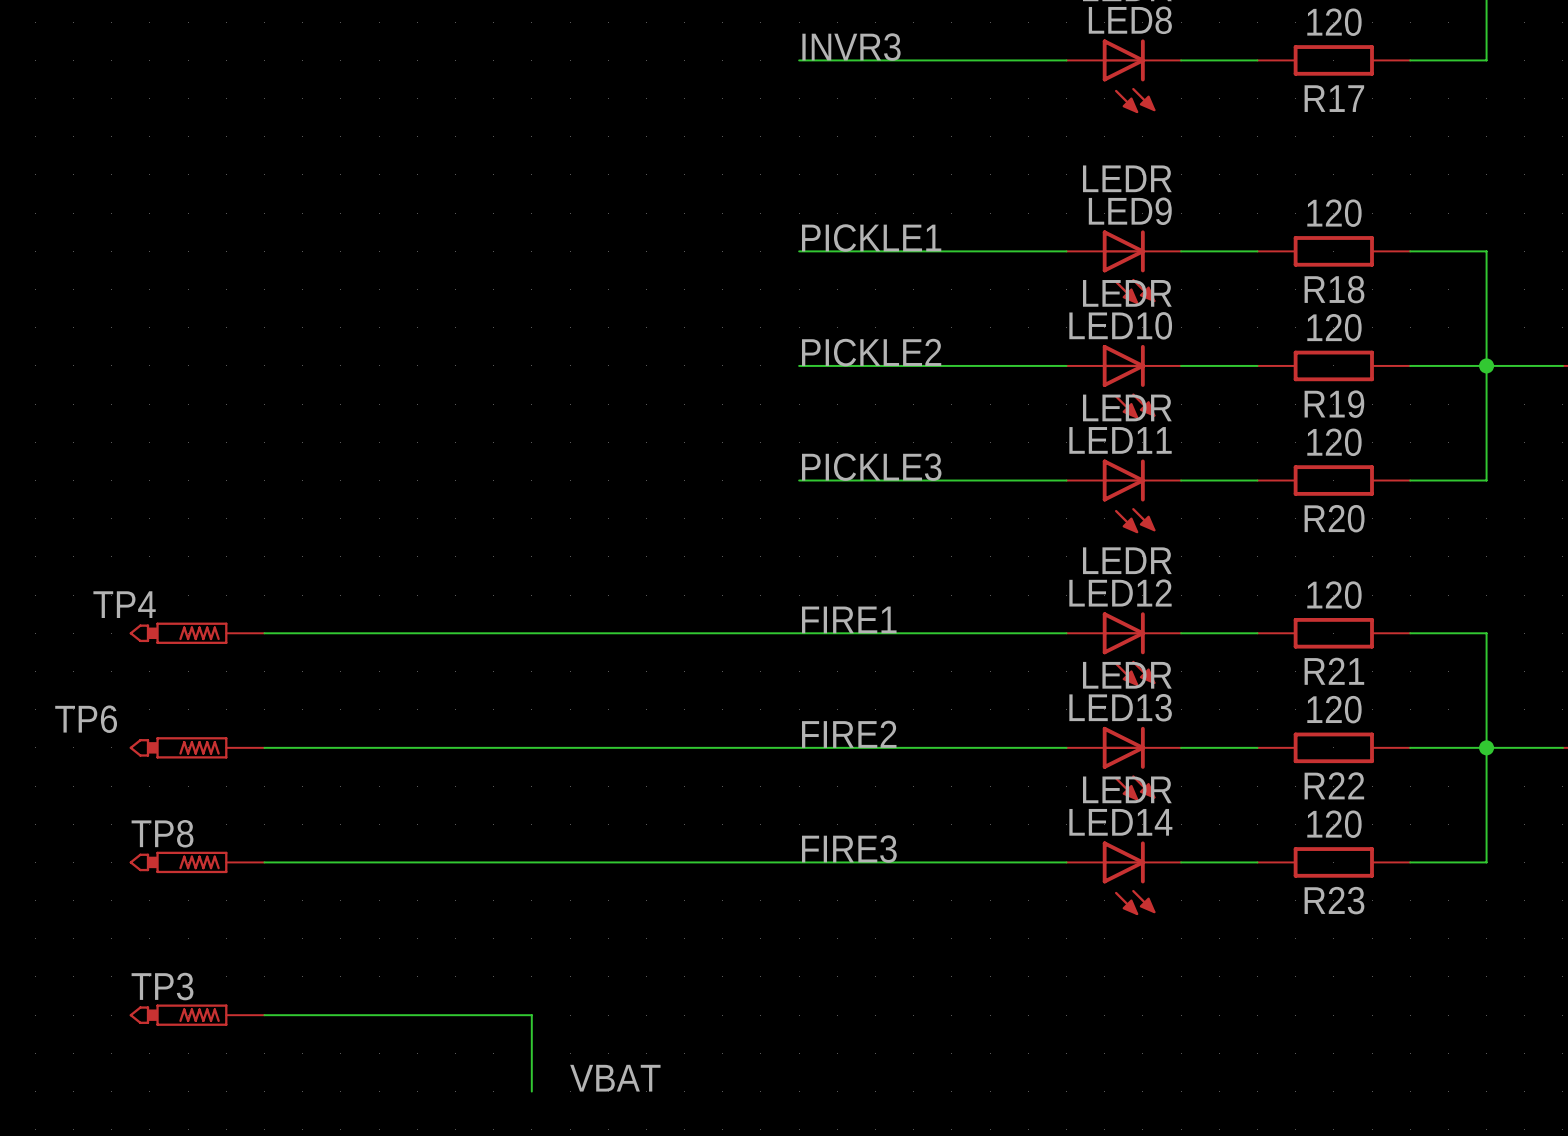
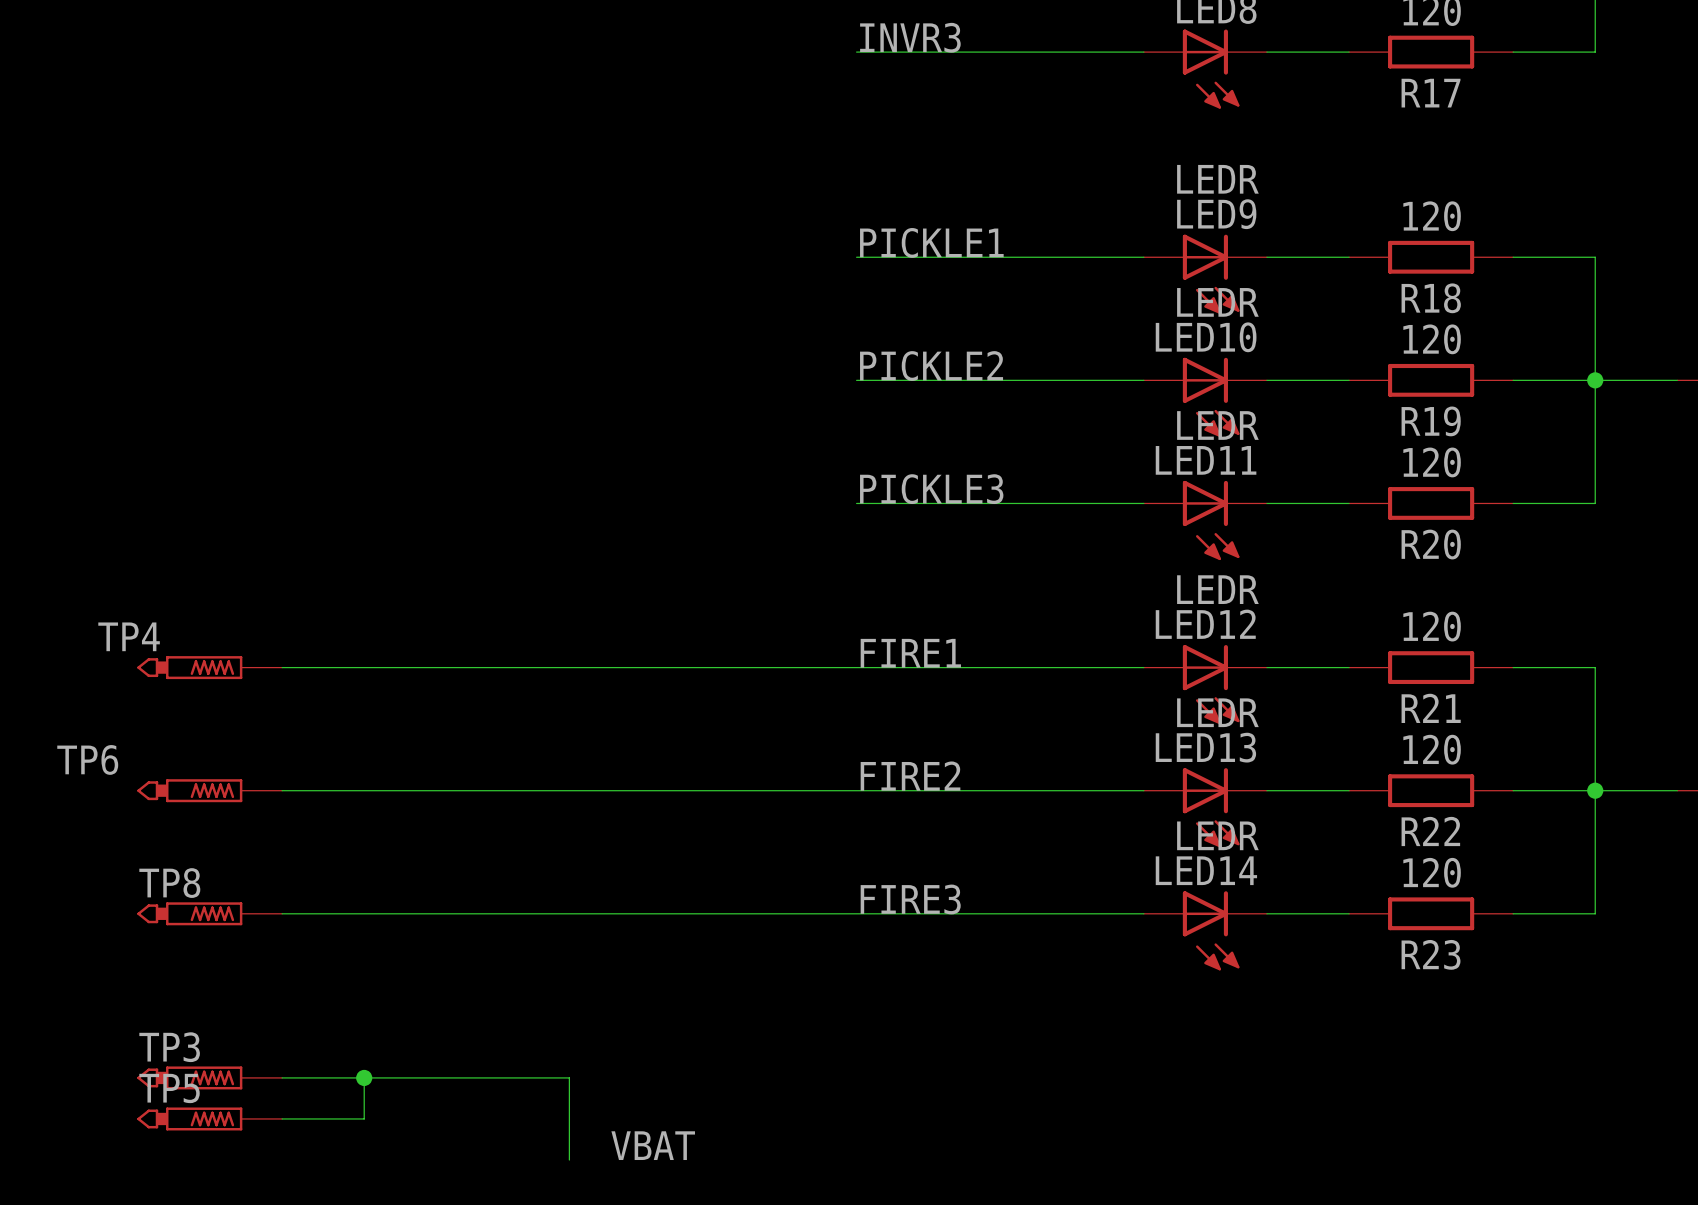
wire: none -> (364, 1077) (364, 1118) (282, 1118)
junction: none -> (364, 1077)
TP5: none -> (209, 1118)

